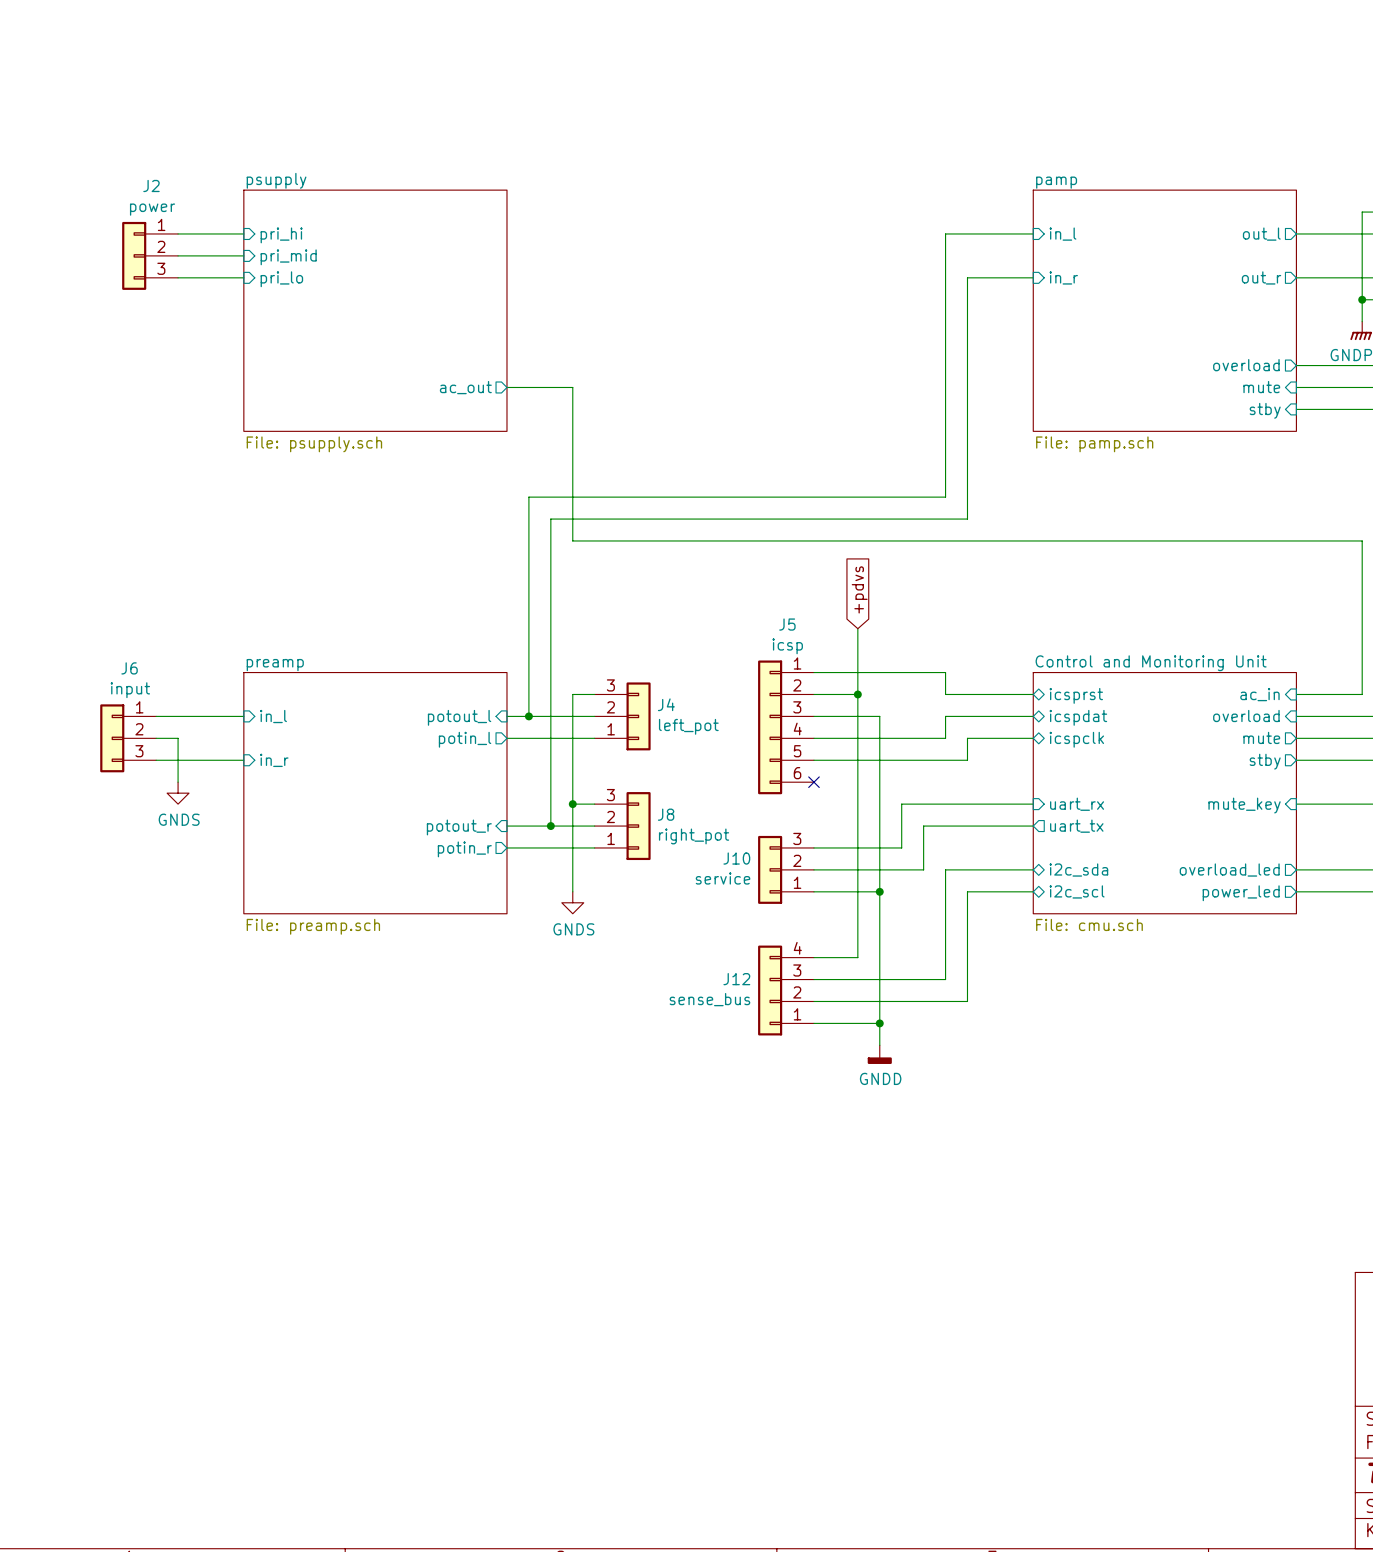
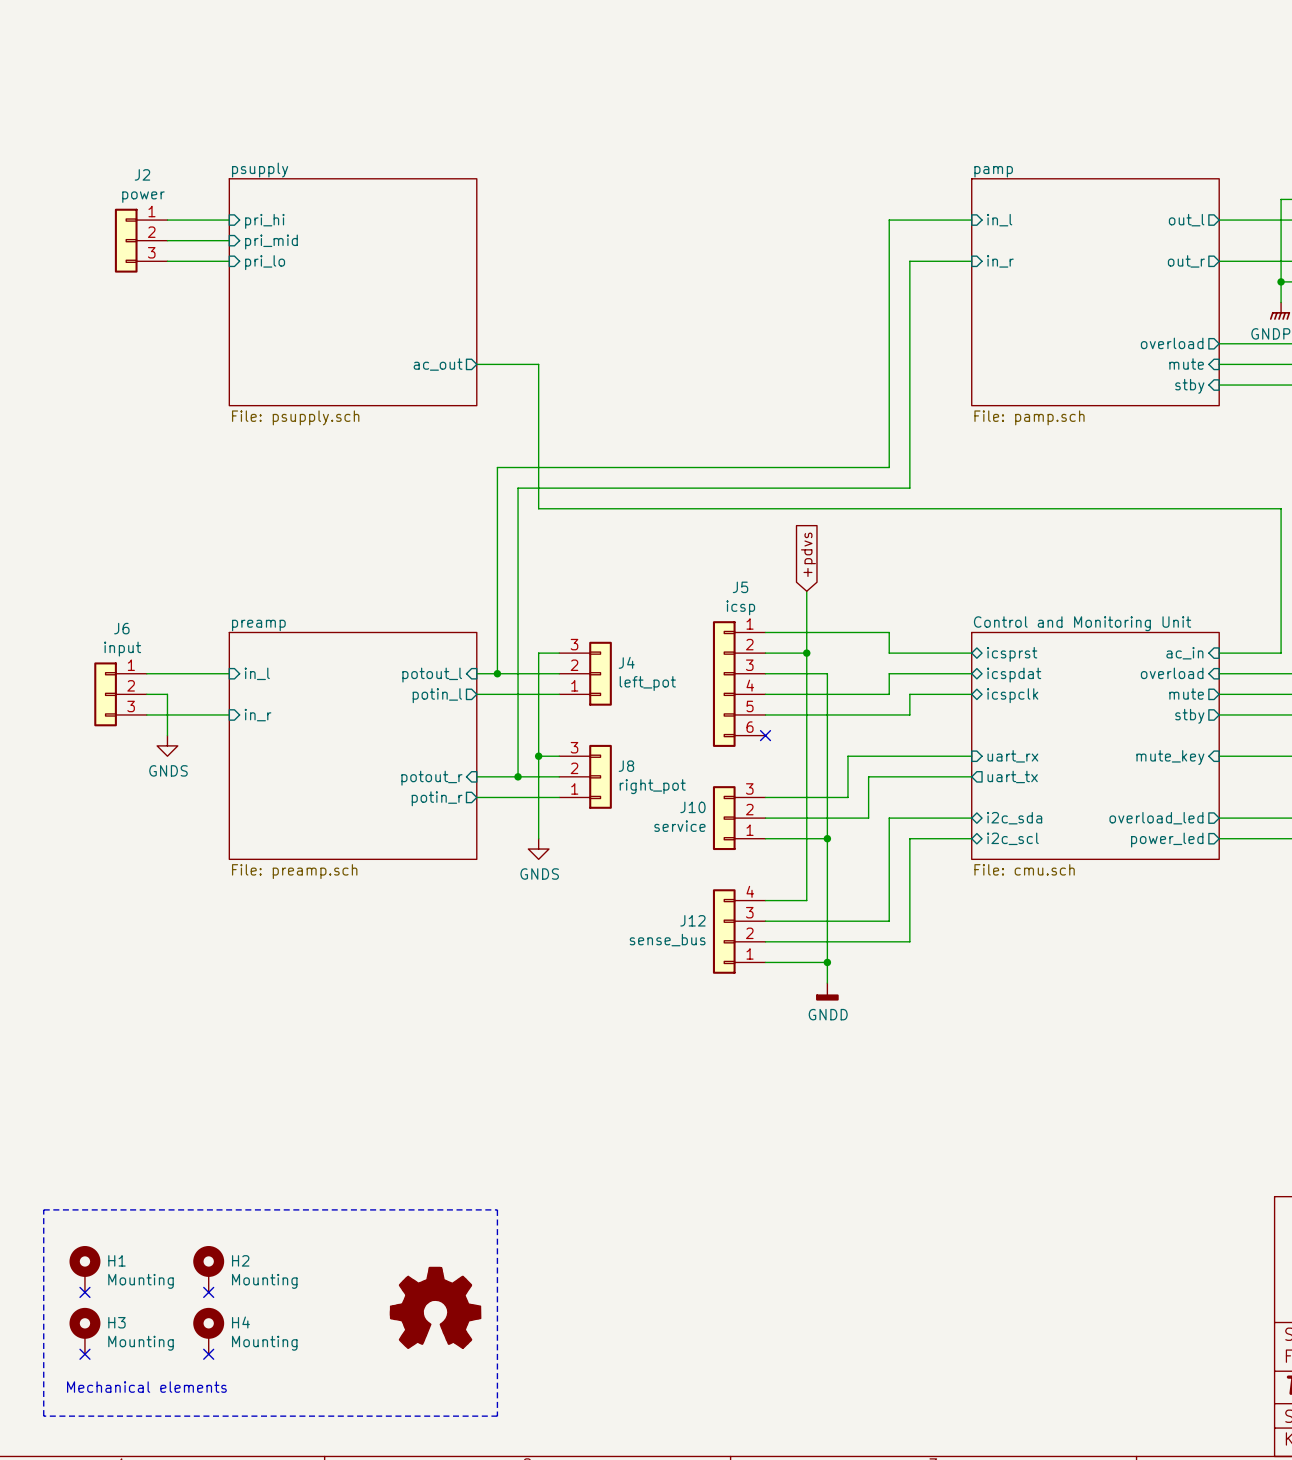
line: none -> (43, 1209) (497, 1209) (497, 1416) (43, 1416) (43, 1209)
H1: none -> Mounting (84, 1269)
H2: none -> Mounting (208, 1269)
no-connect mark: none -> (84, 1292)
no-connect mark: none -> (208, 1292)
power symbol: none -> (435, 1307)
H3: none -> Mounting (84, 1331)
H4: none -> Mounting (208, 1331)
no-connect mark: none -> (84, 1354)
no-connect mark: none -> (208, 1354)
text: none -> Mechanical elements (146, 1387)

